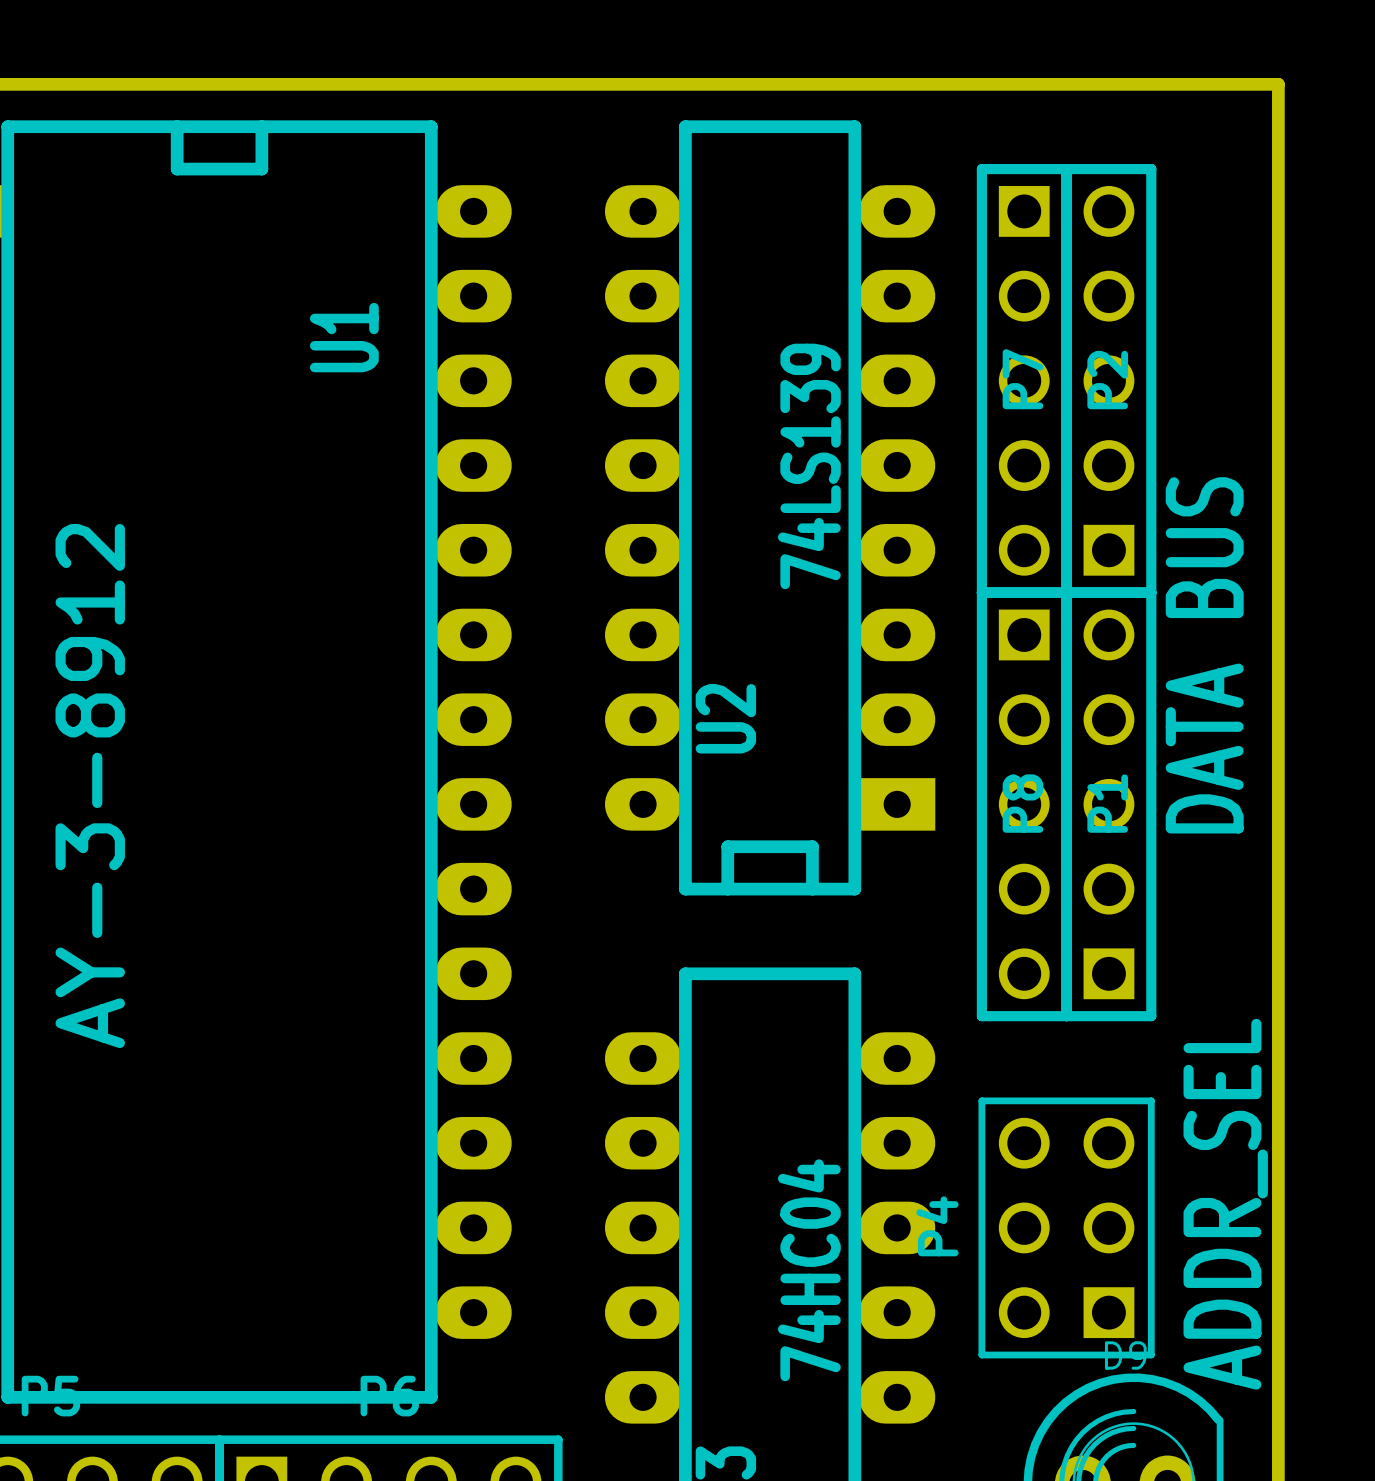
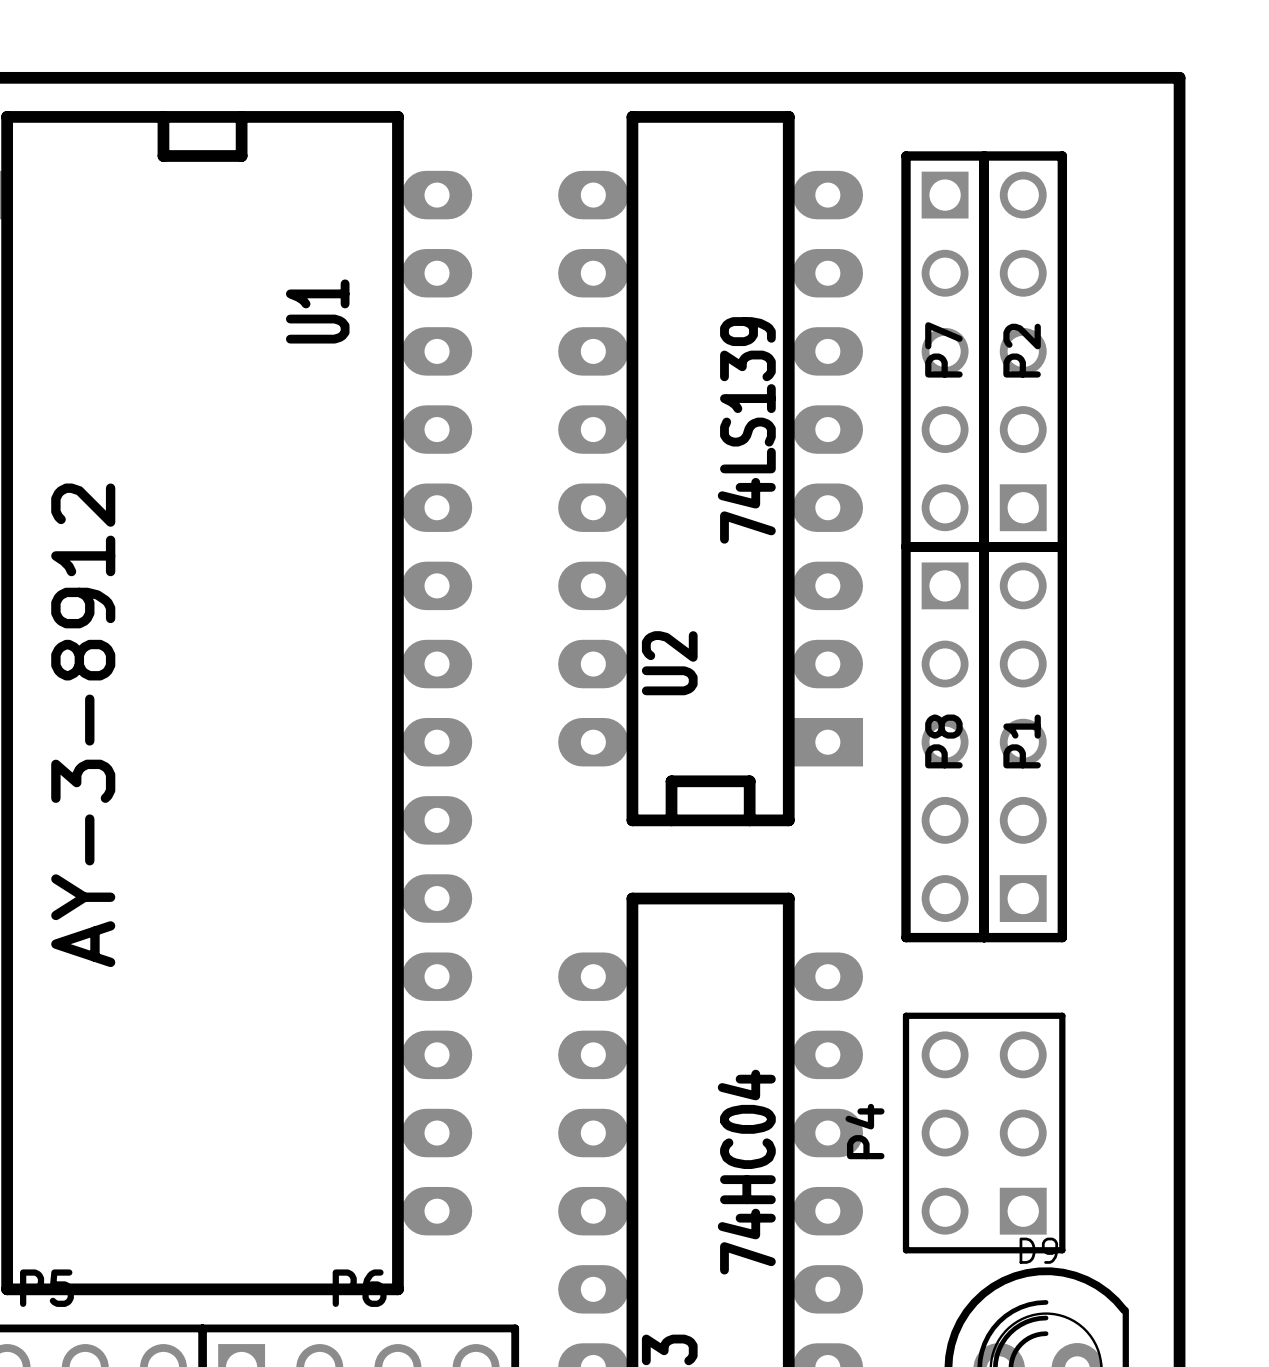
text: DATA BUS (1204, 655) -> none
text: ADDR_SEL (1225, 1204) -> none

